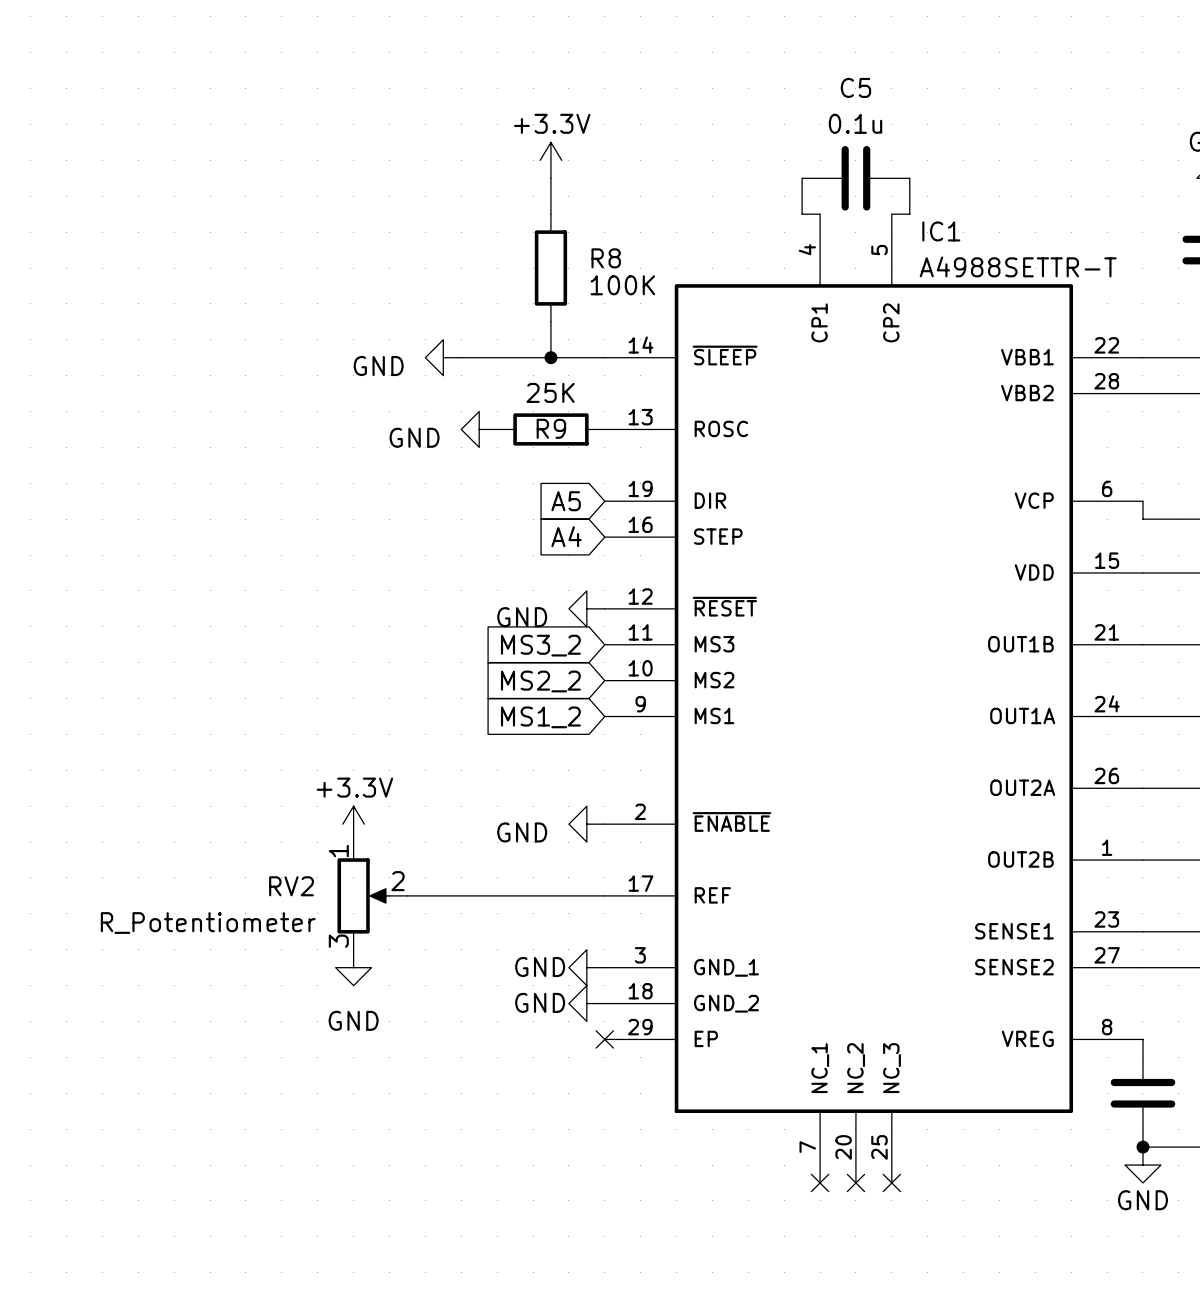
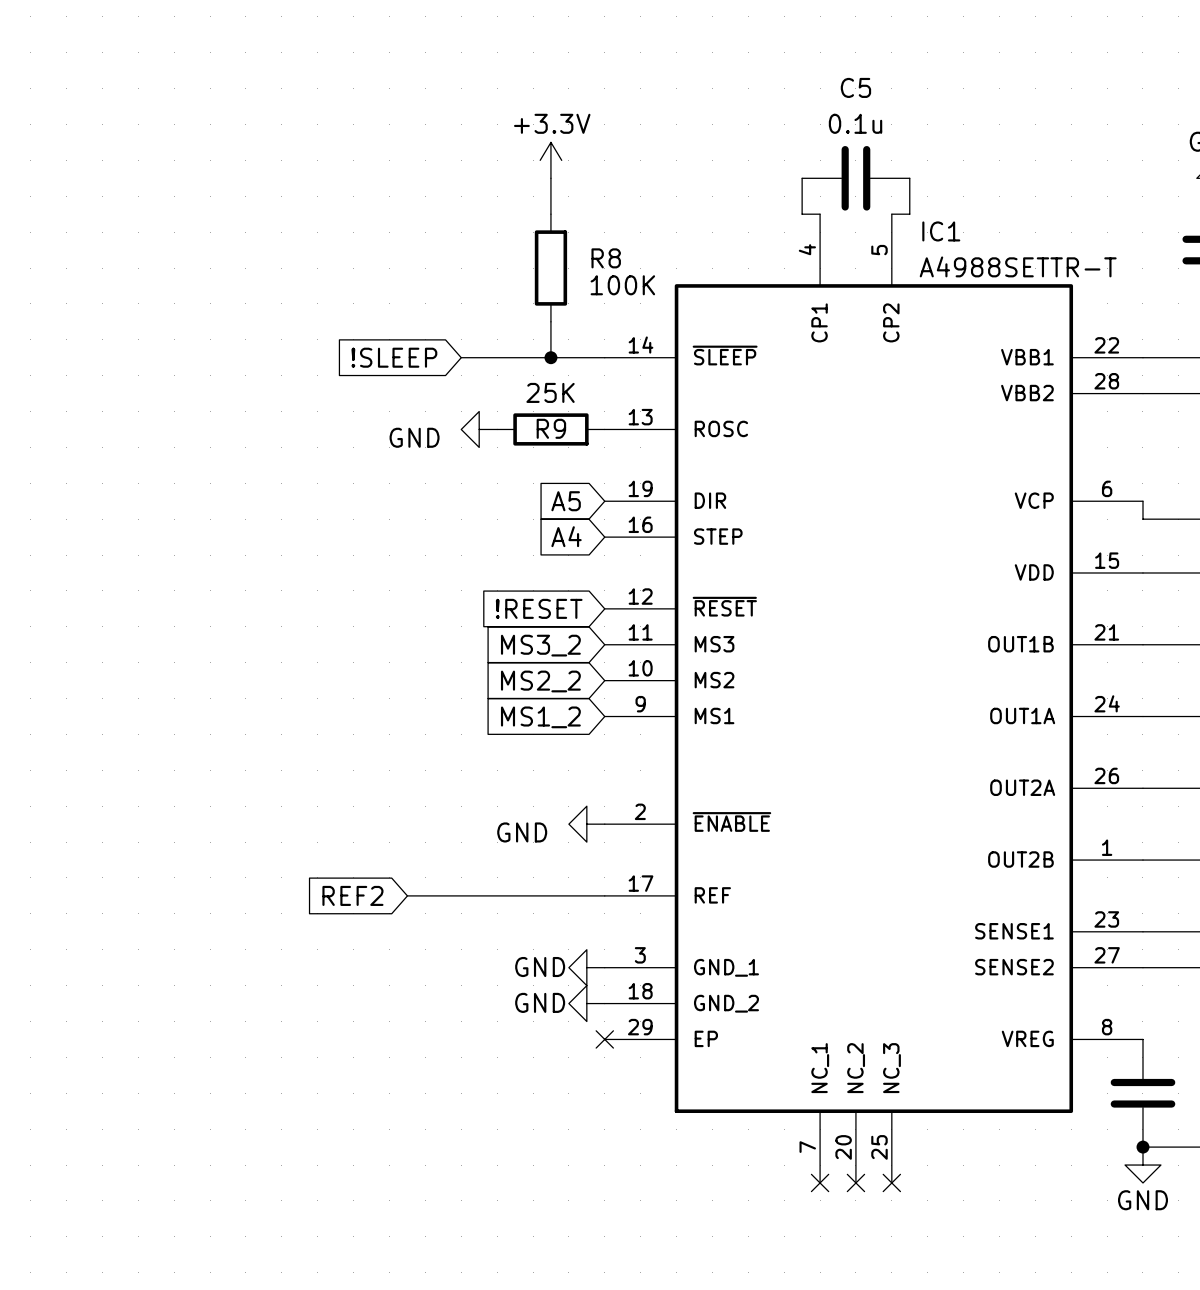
global label: none -> !SLEEP (394, 357)
power symbol: GND (443, 357) -> none
global label: none -> !RESET (539, 608)
power symbol: GND (586, 608) -> none
power symbol: +3.3V (353, 824) -> none
global label: none -> REF2 (352, 895)
RV2: R_Potentiometer (372, 895) -> none
power symbol: GND (353, 967) -> none

